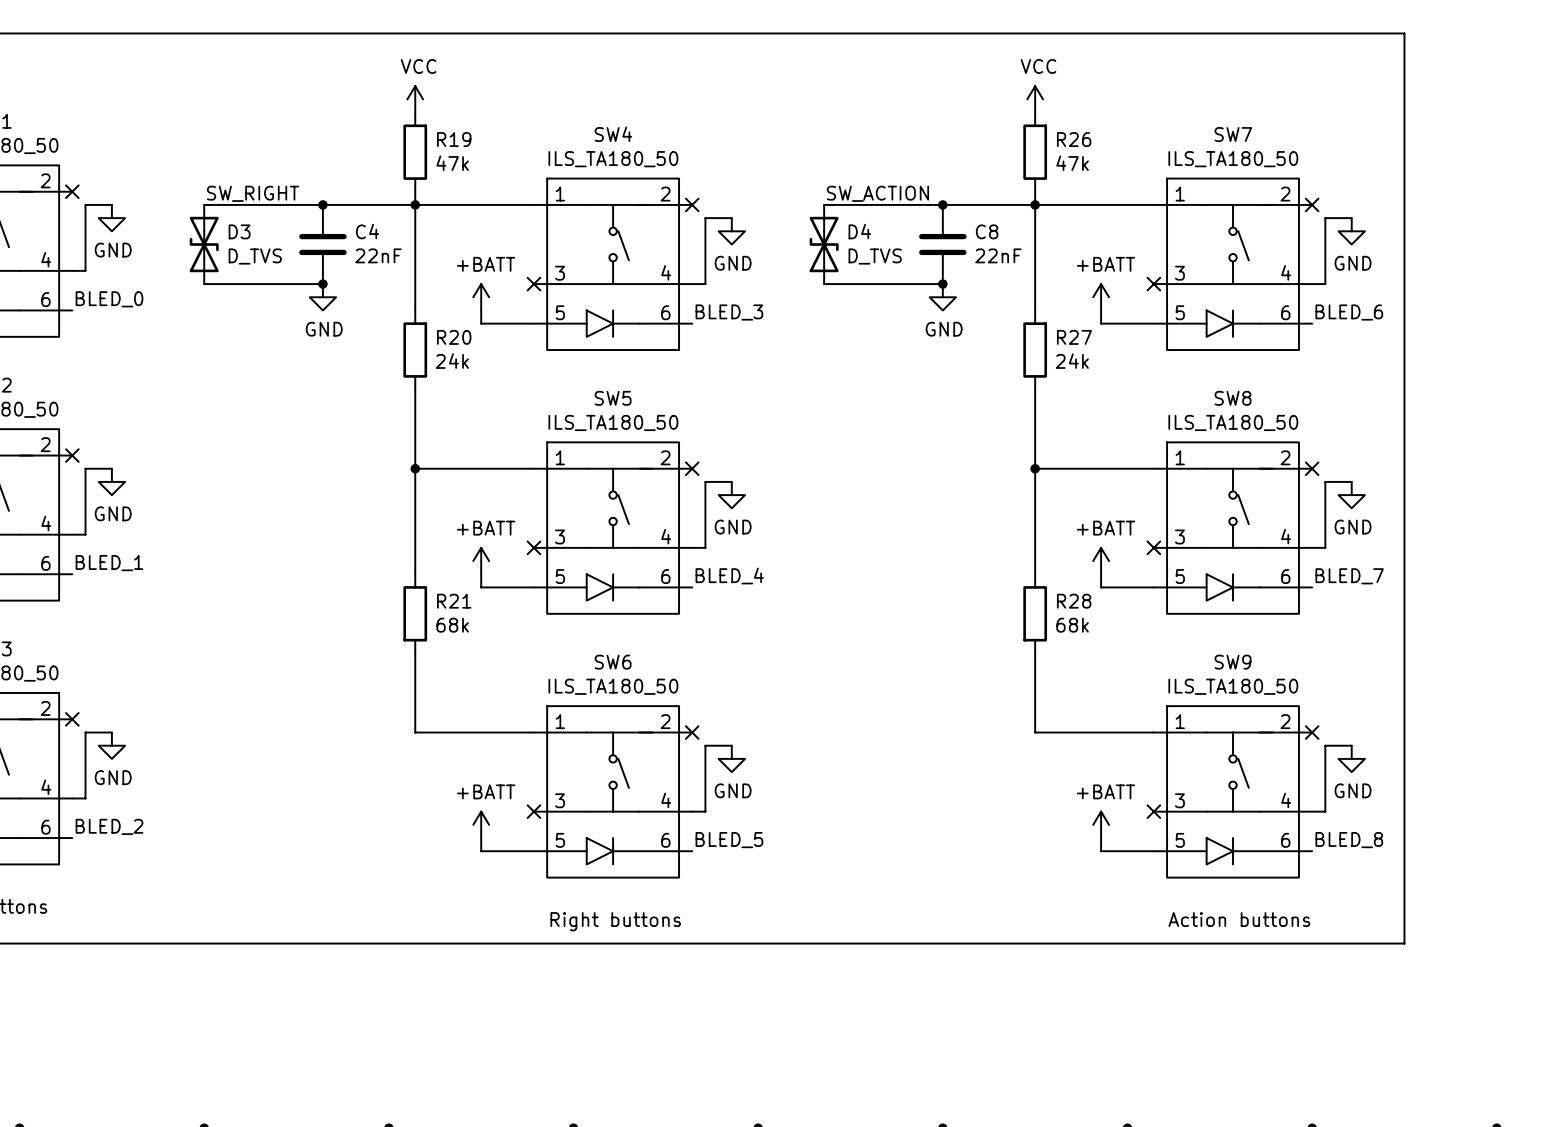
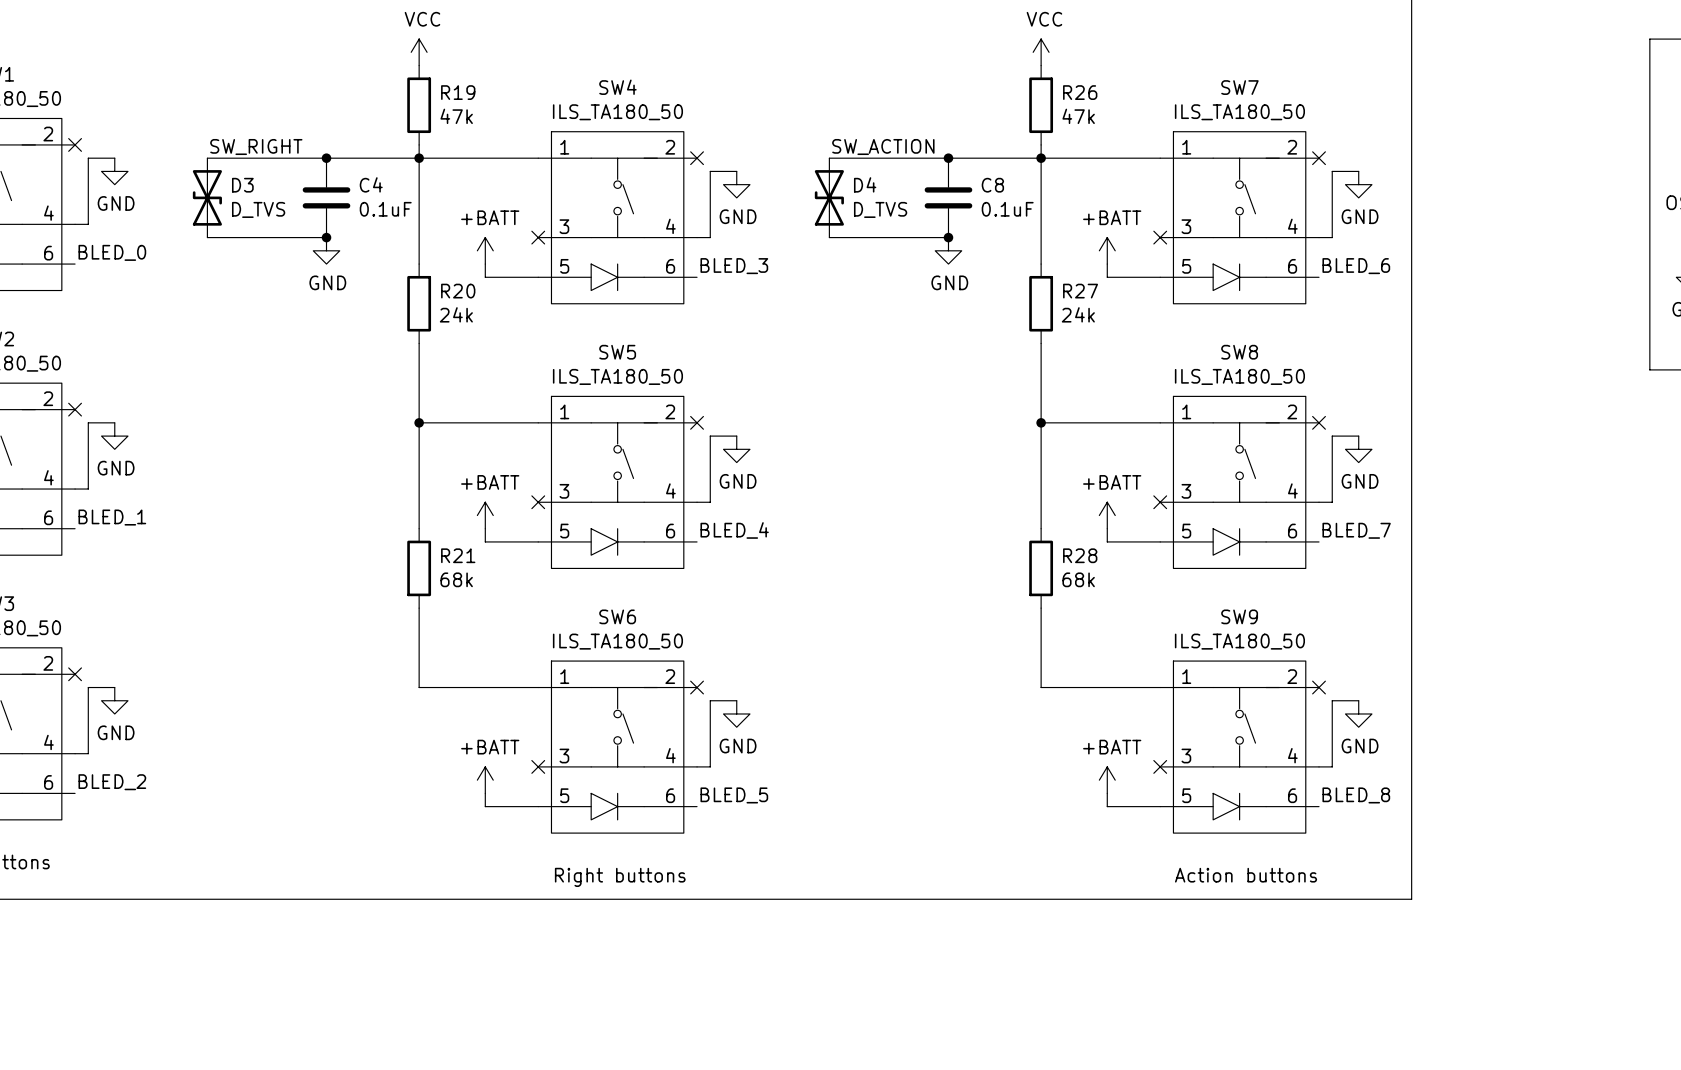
C4 value: 22nF (378, 255) -> 0.1uF (385, 209)
C8 value: 22nF (998, 255) -> 0.1uF (1007, 209)

